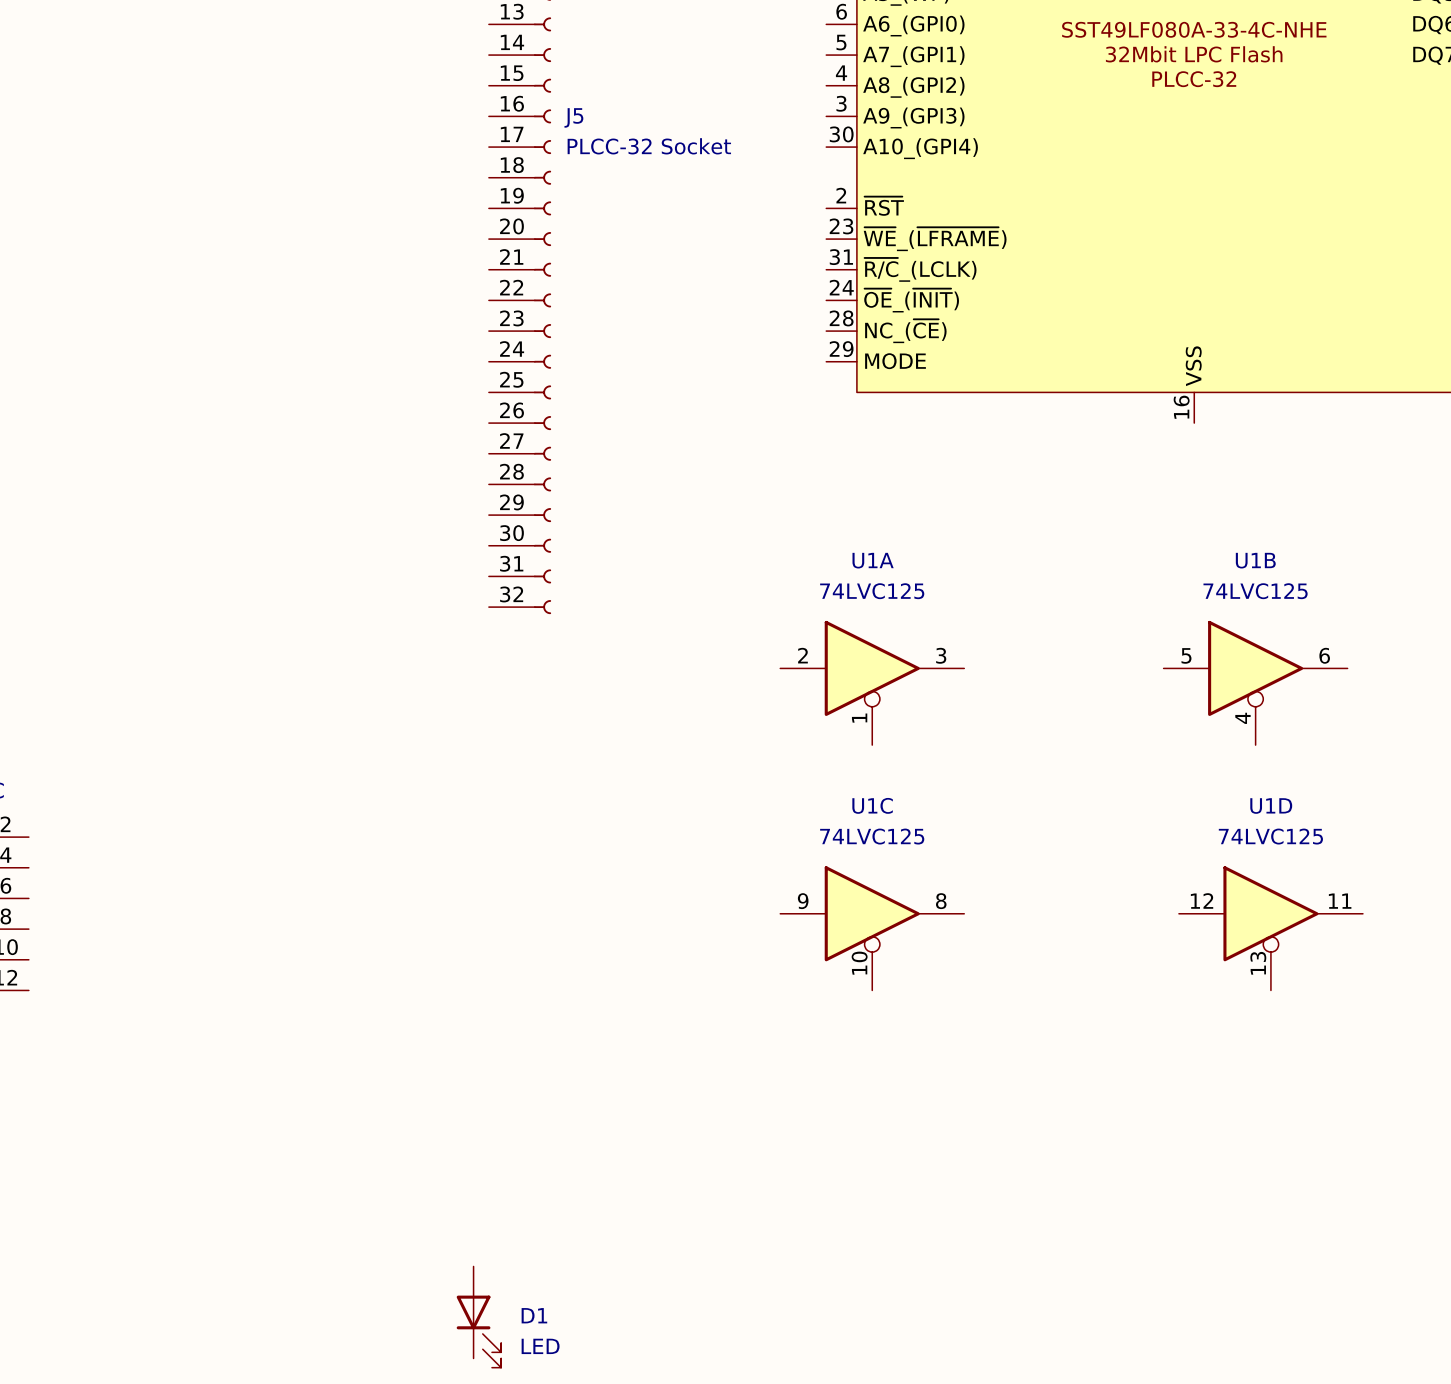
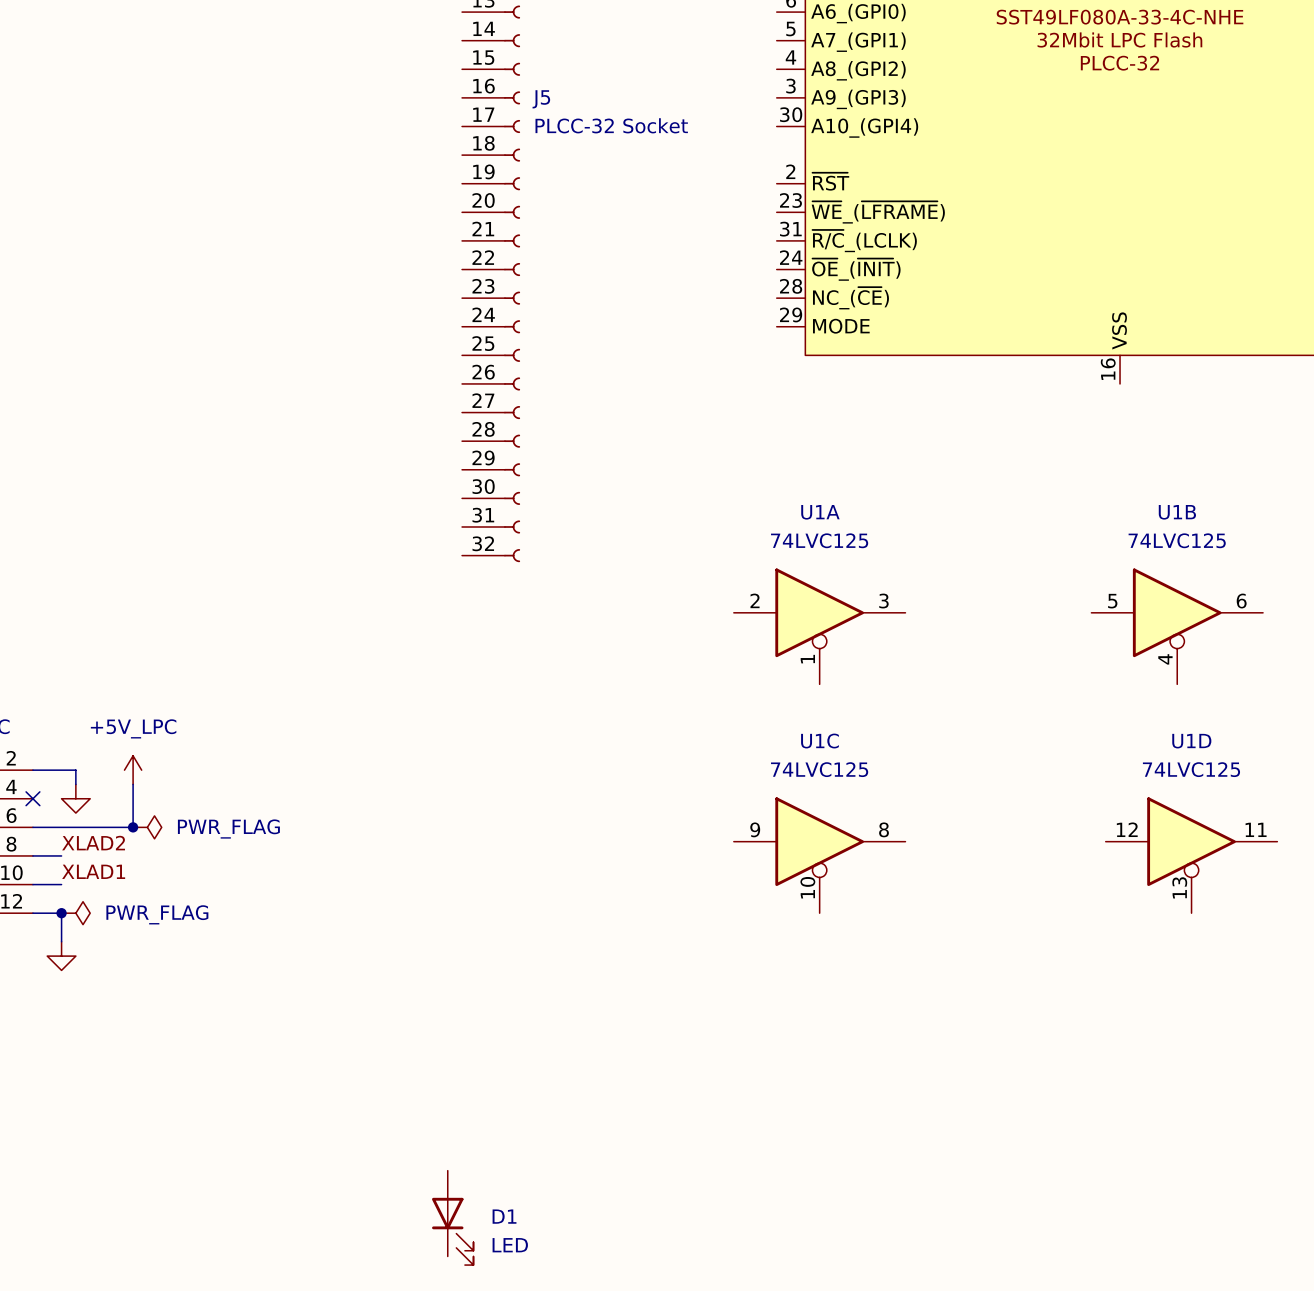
wire: none -> (32, 770) (75, 770) (75, 784)
power symbol: none -> +5V_LPC (133, 770)
wire: none -> (133, 784) (133, 827) (32, 827)
no-connect mark: none -> (32, 798)
power symbol: none -> (75, 798)
junction: none -> (133, 827)
power symbol: none -> PWR_FLAG (147, 827)
label: none -> XLAD2 (93, 843)
wire: none -> (32, 855) (61, 855)
label: none -> XLAD1 (93, 871)
wire: none -> (32, 884) (61, 884)
wire: none -> (32, 913) (61, 913) (61, 941)
junction: none -> (61, 913)
power symbol: none -> PWR_FLAG (75, 913)
power symbol: none -> (61, 956)

